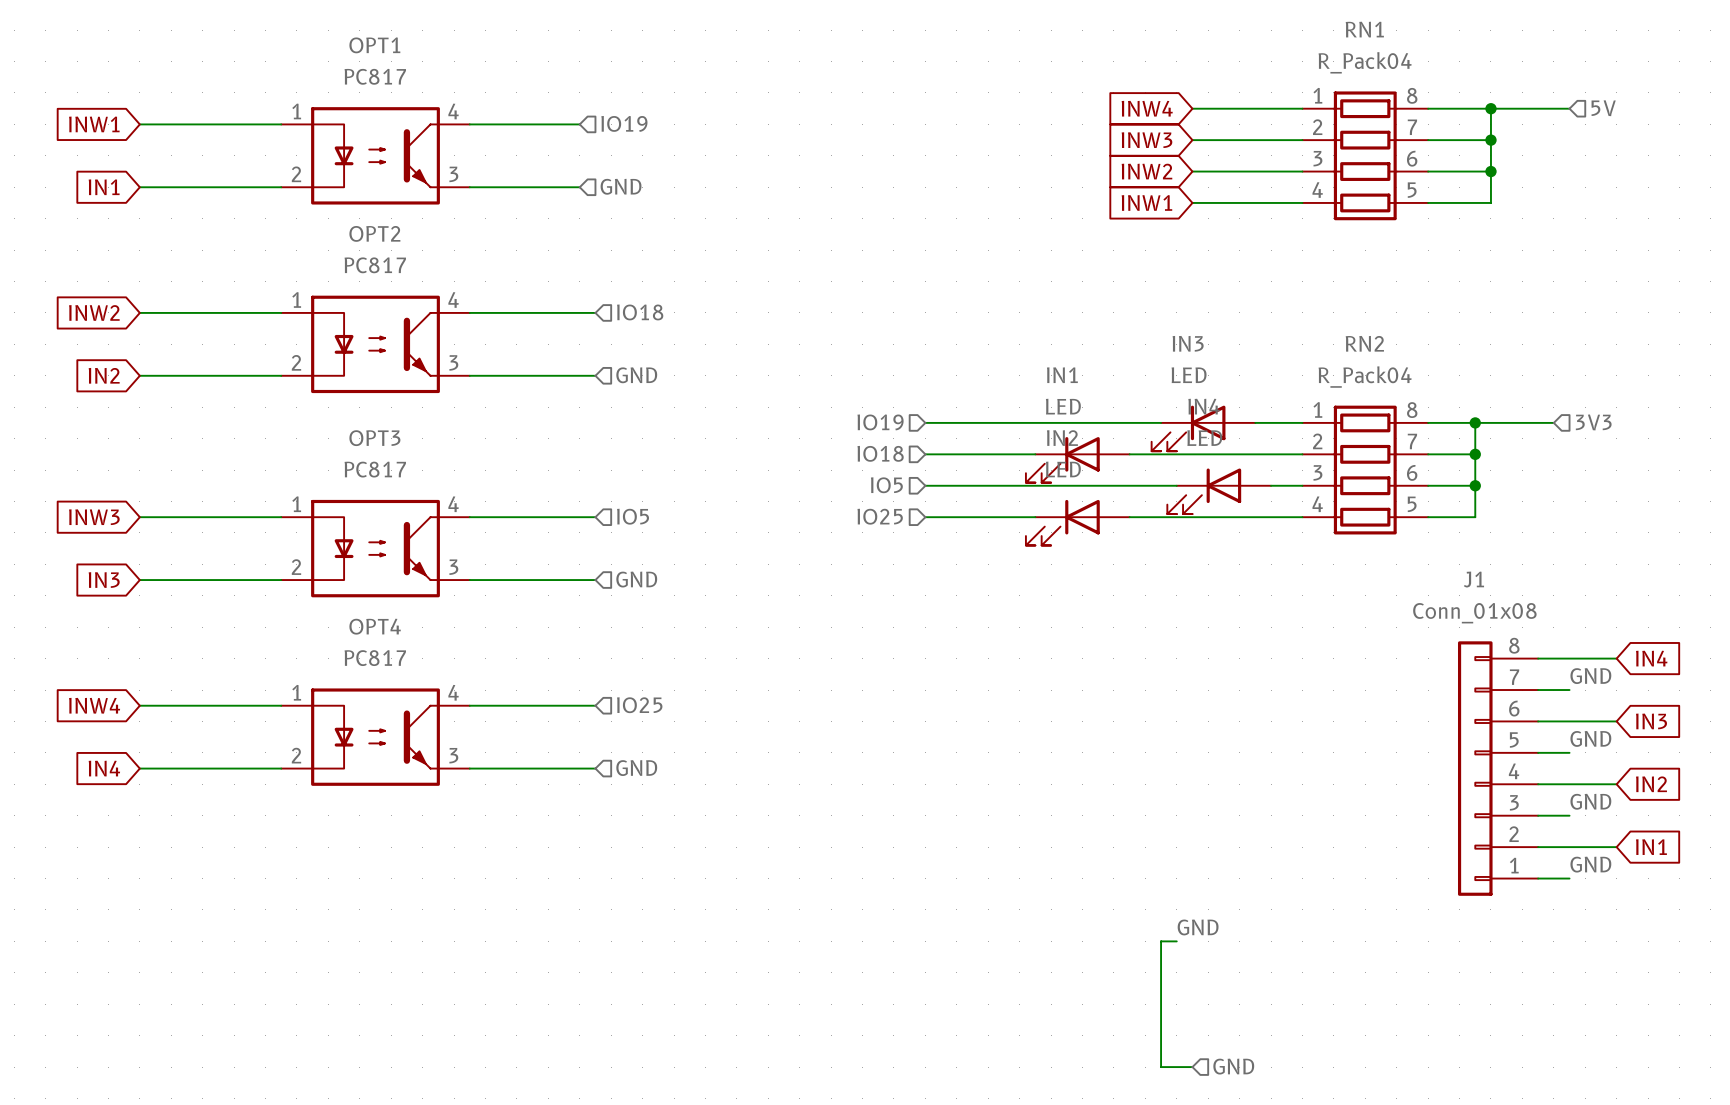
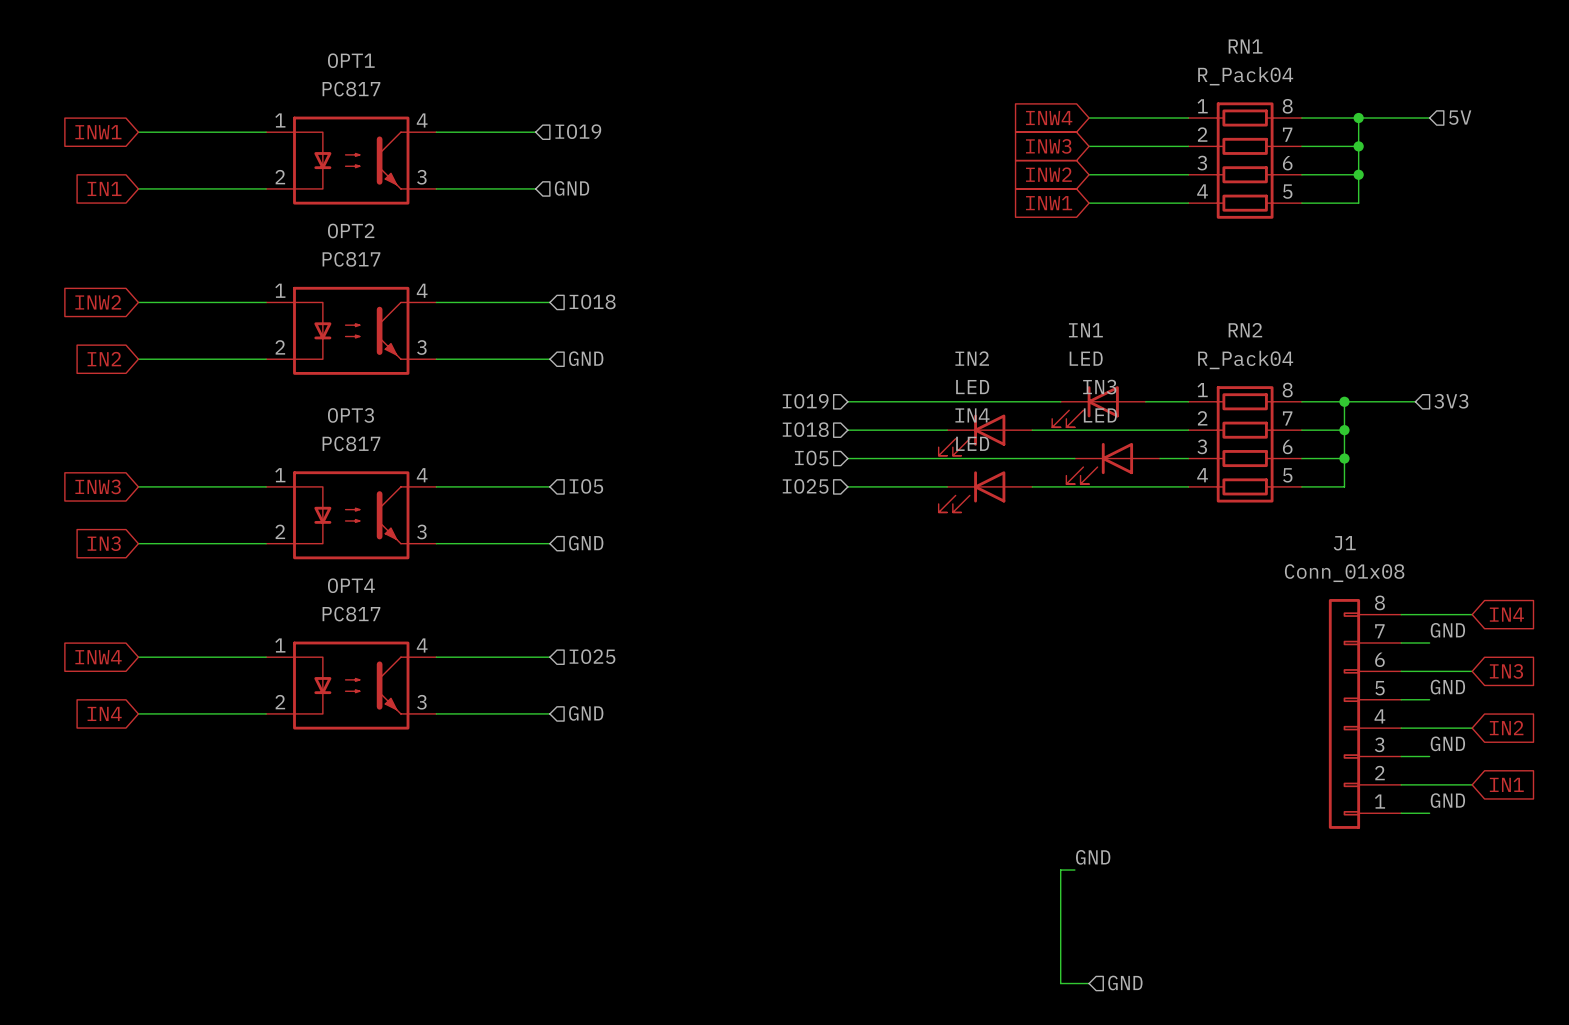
IN3 name: IN3 (1188, 343) -> IN1 (1085, 330)
IN1 name: IN1 (1062, 375) -> IN2 (972, 358)
IN4 name: IN4 (1204, 406) -> IN3 (1099, 387)
IN2 name: IN2 (1062, 438) -> IN4 (972, 415)

